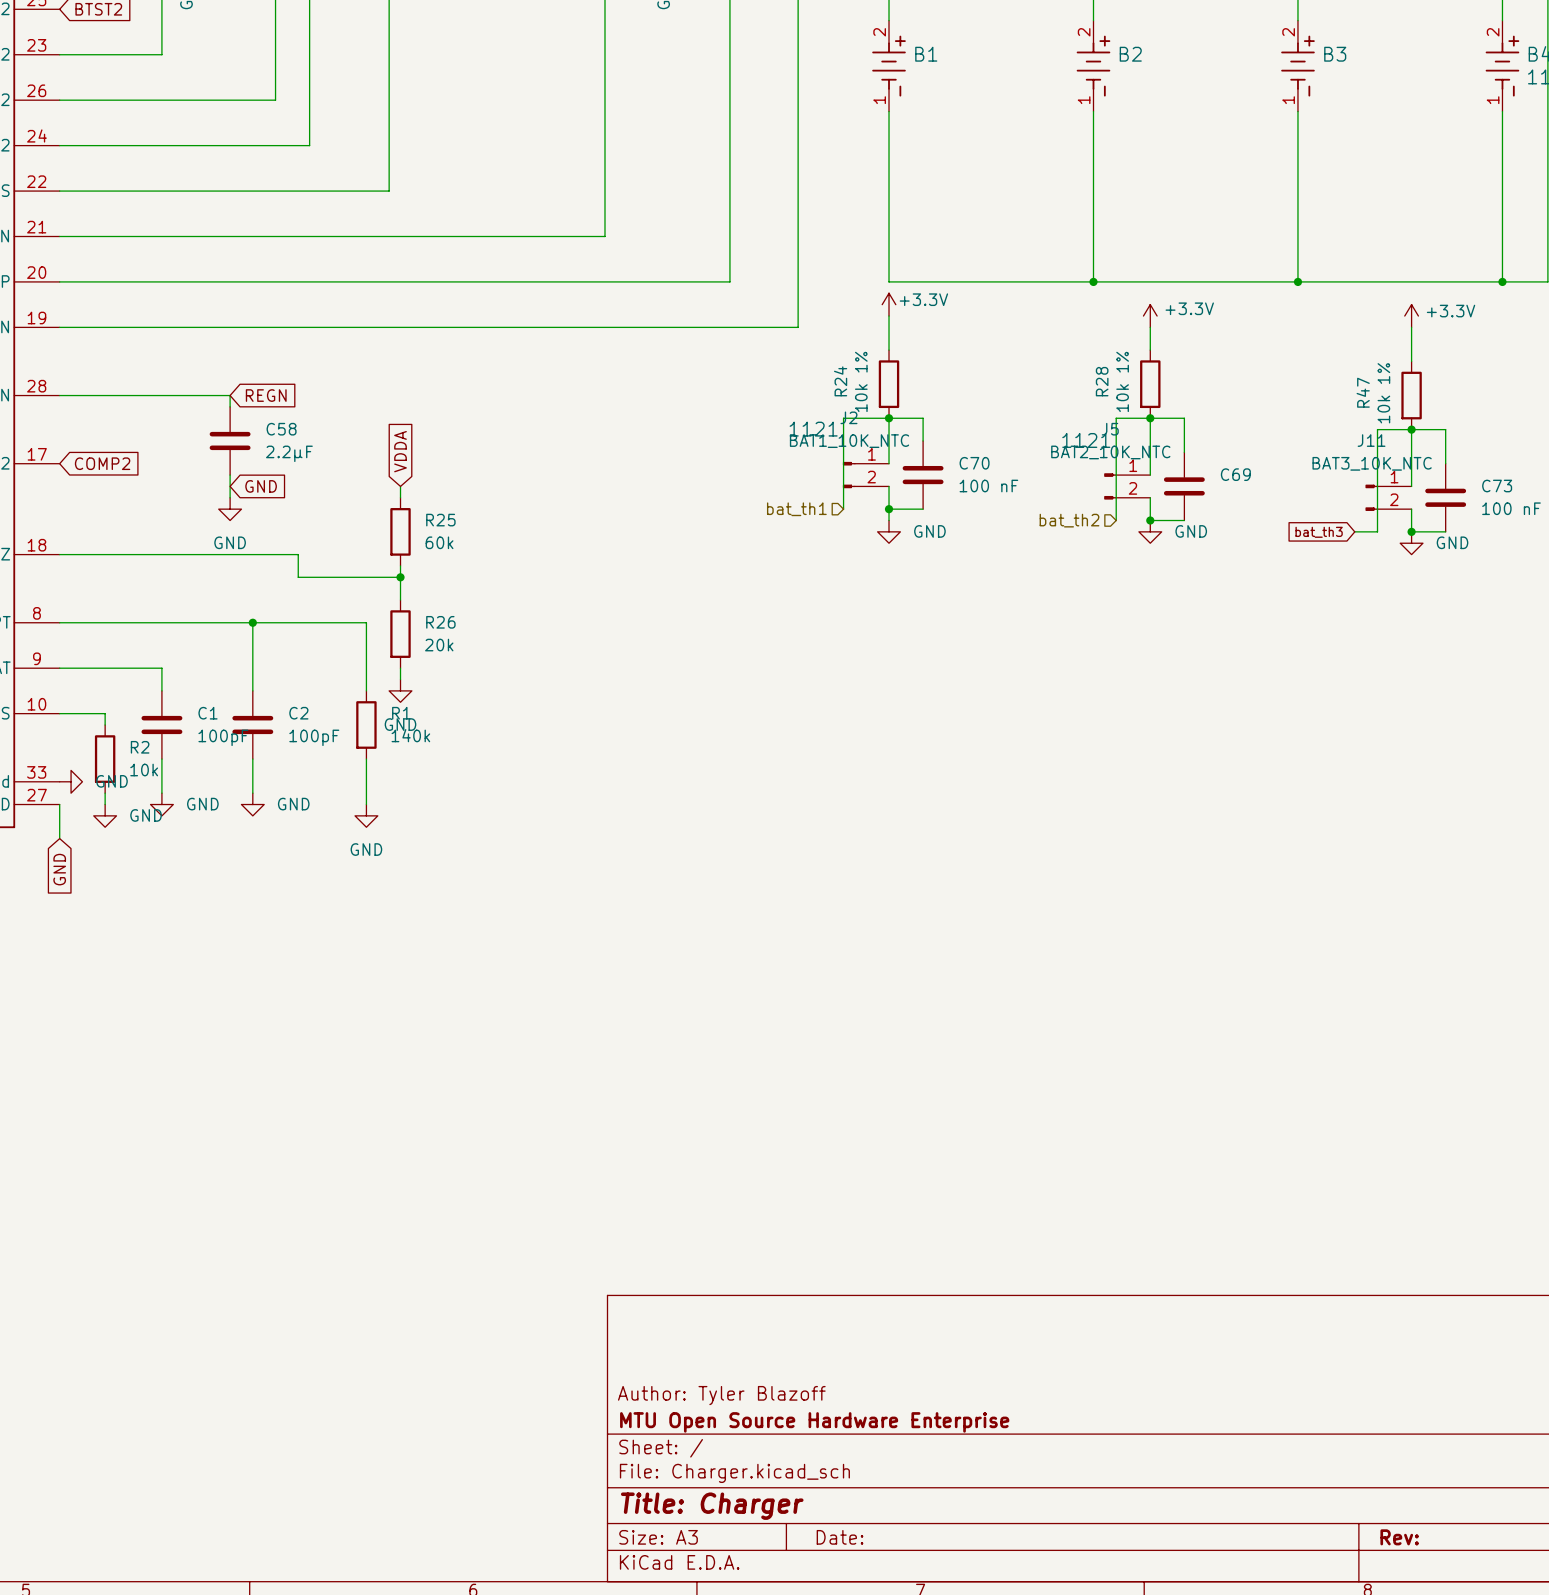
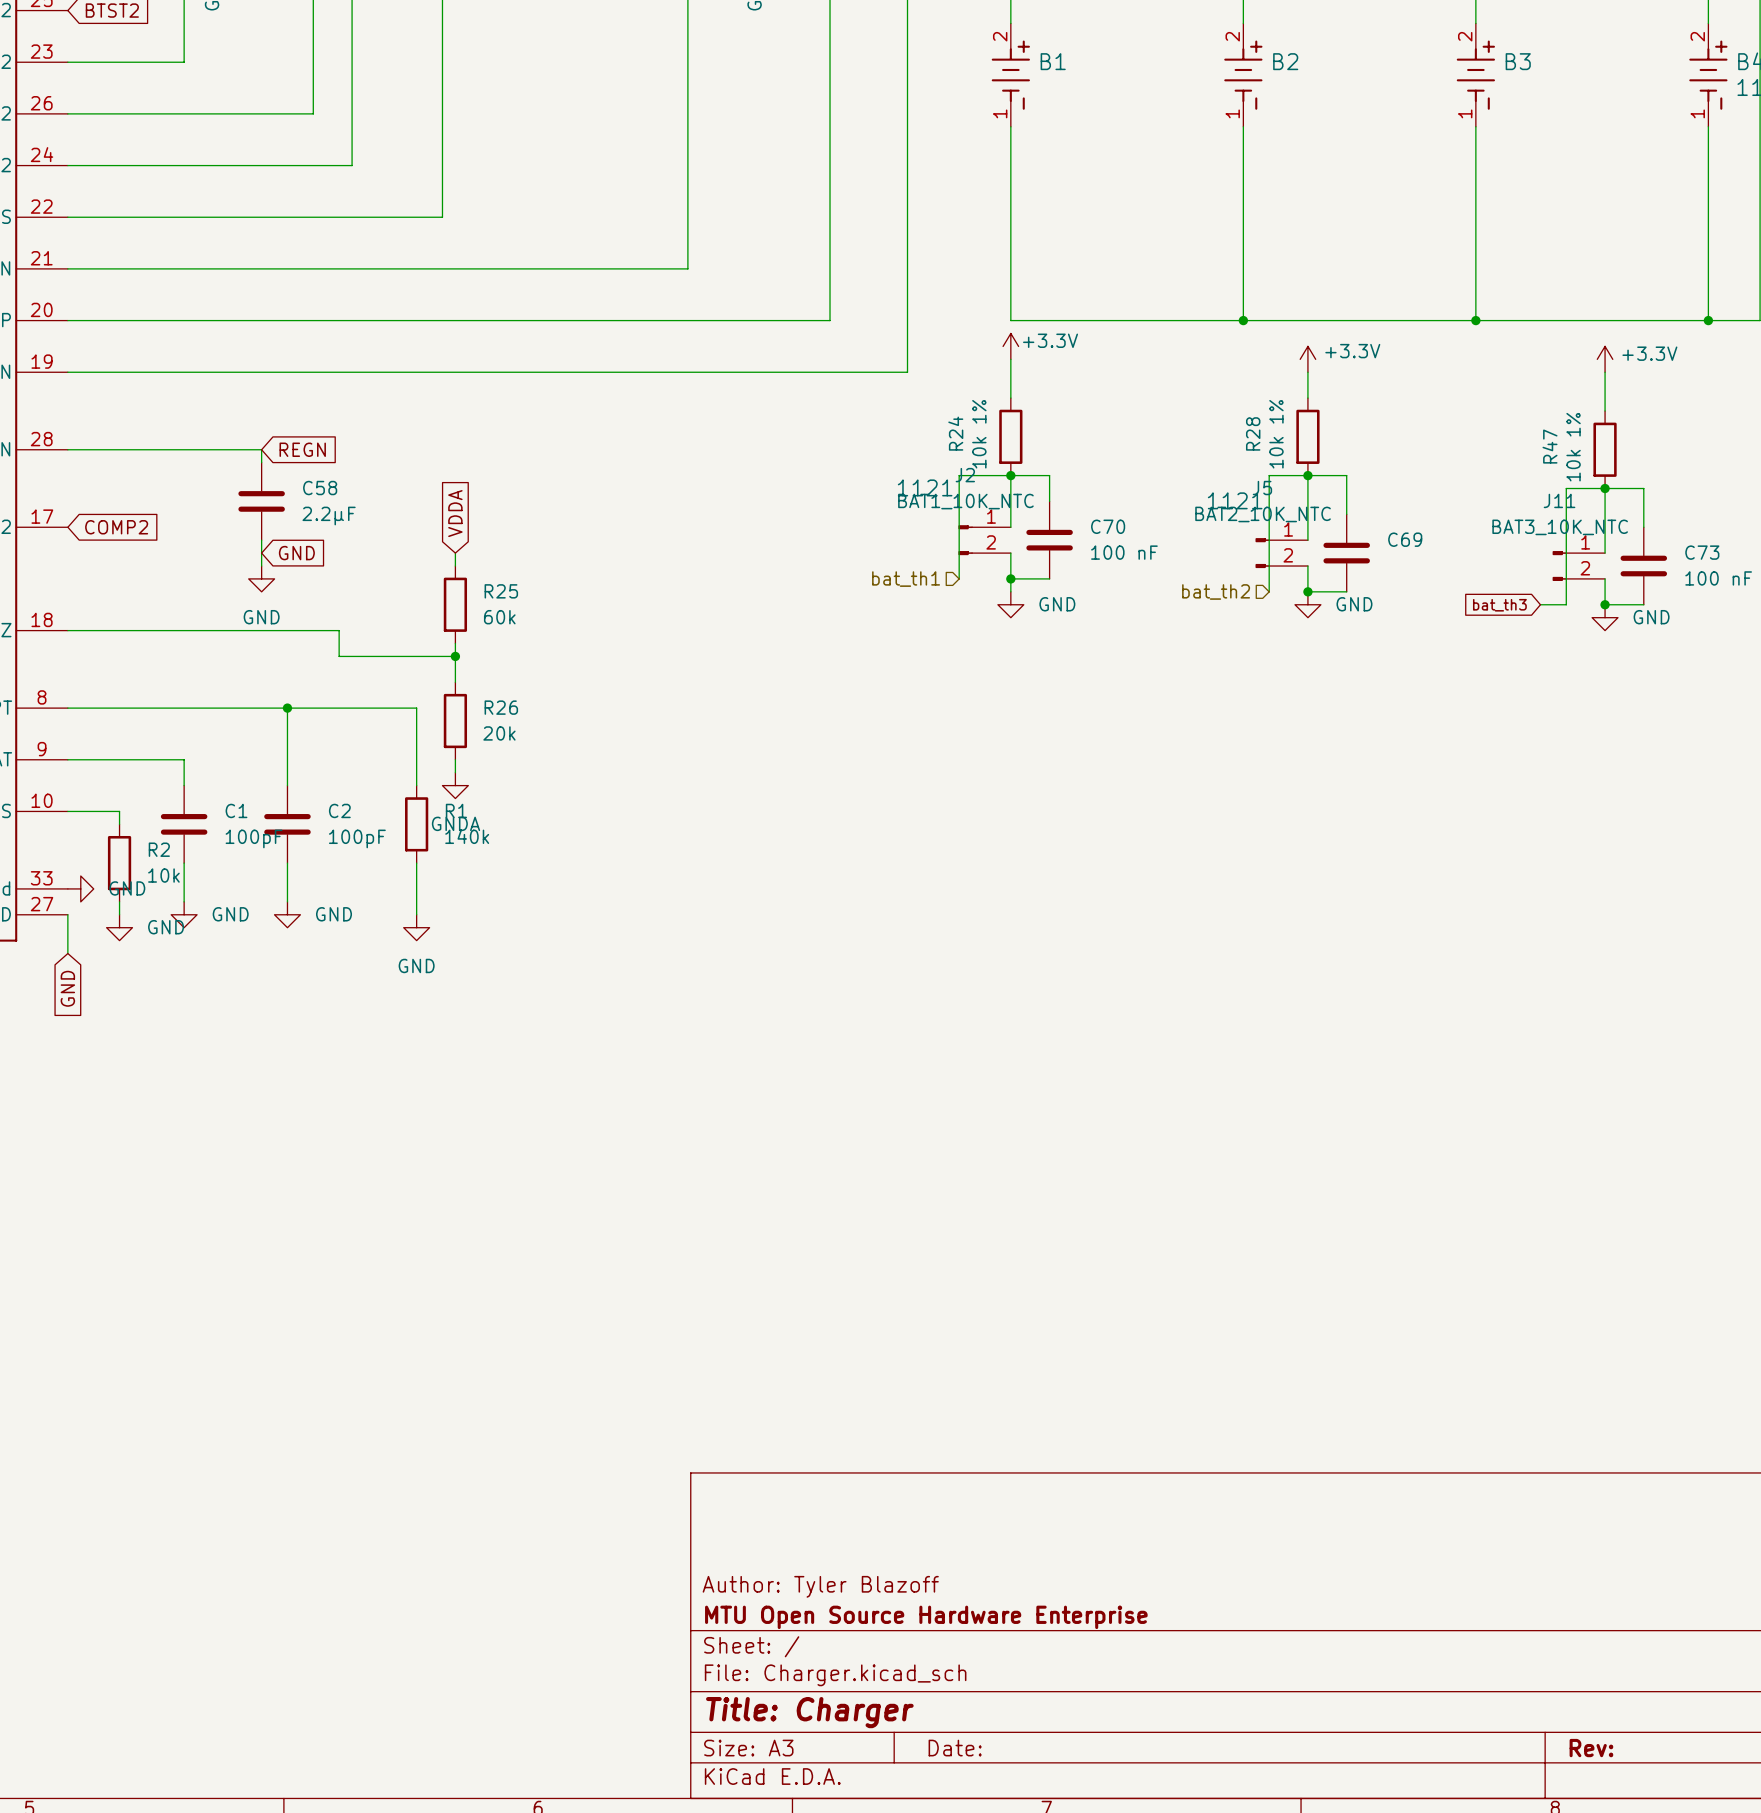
power symbol: GND (400, 690) -> GNDA (455, 785)

